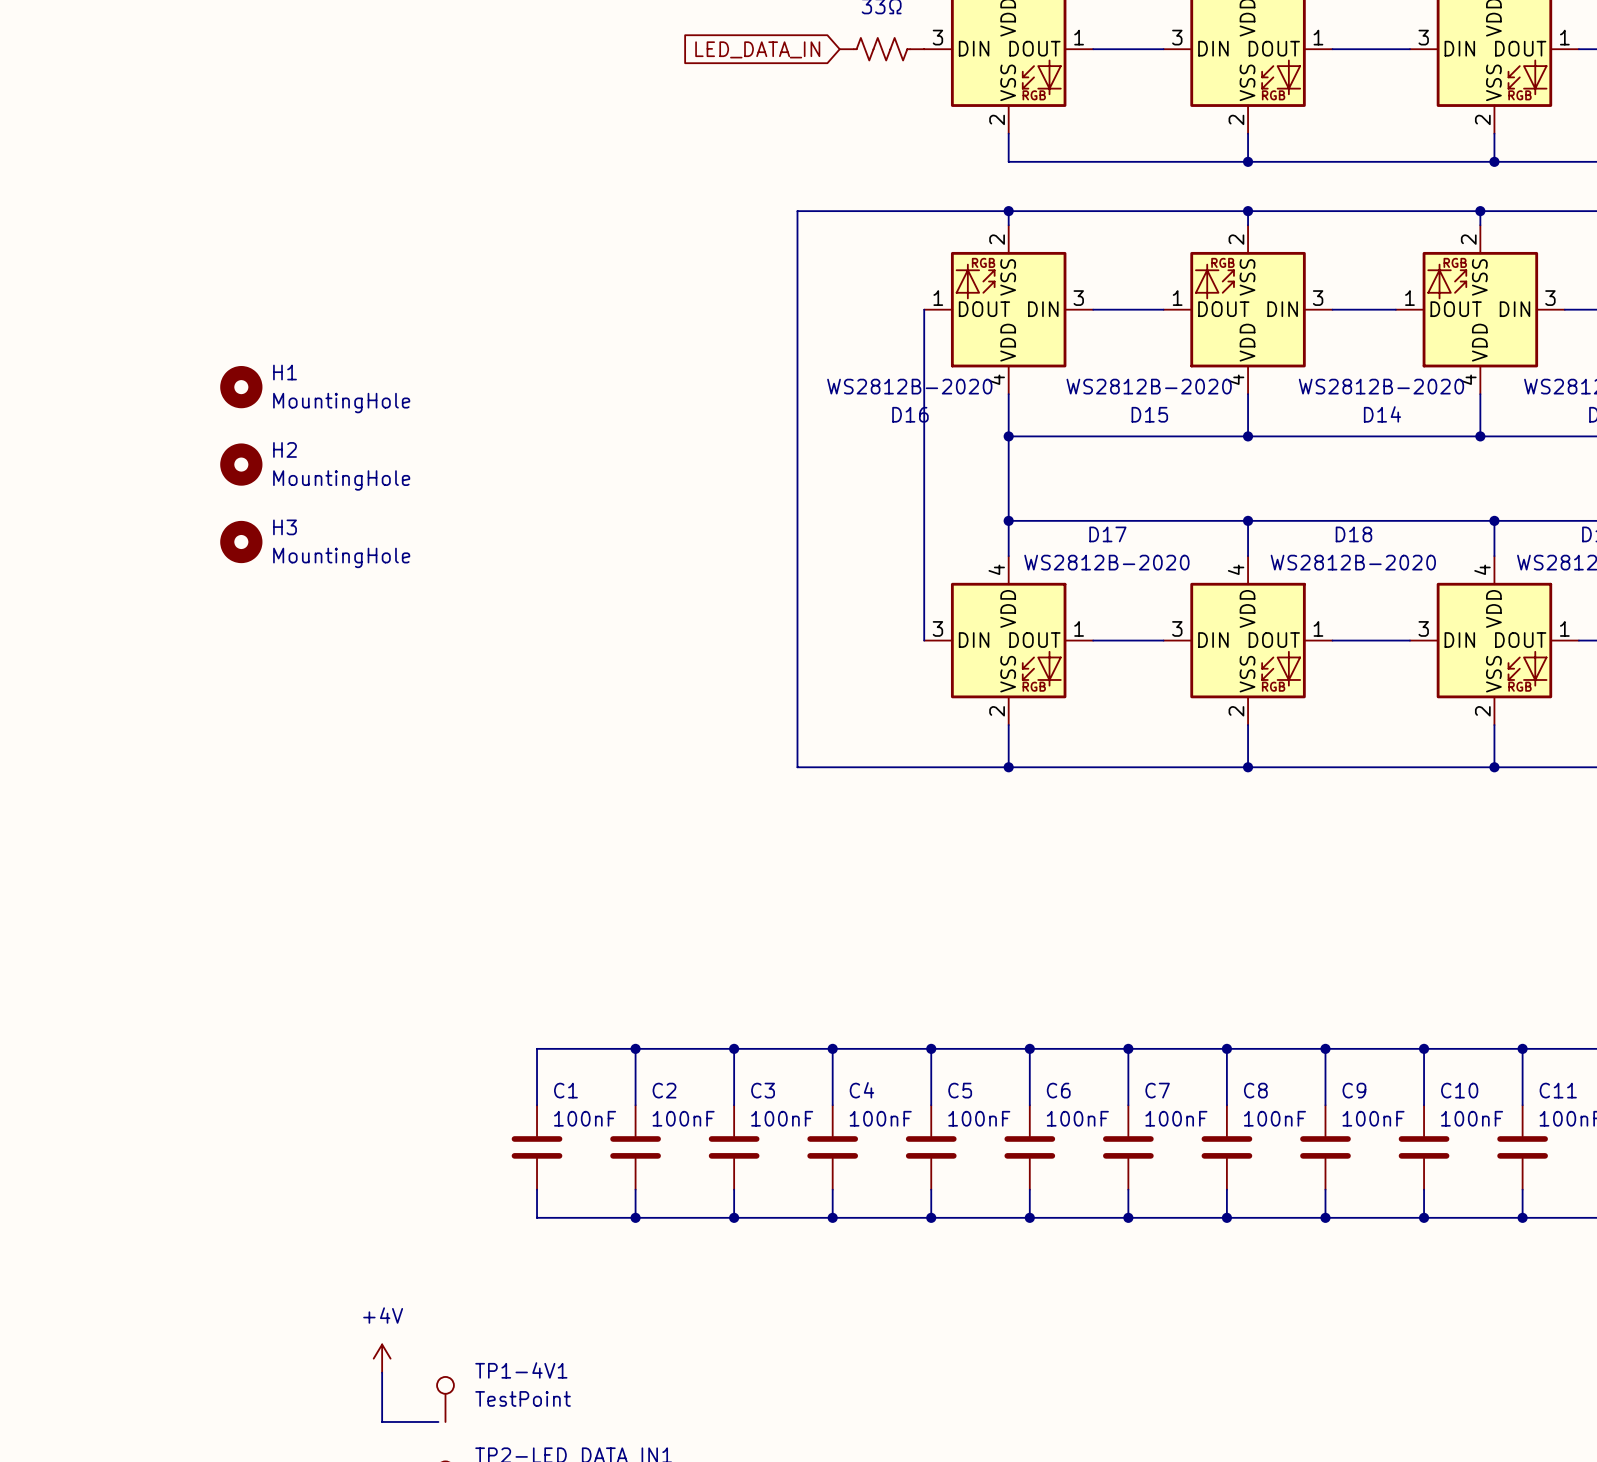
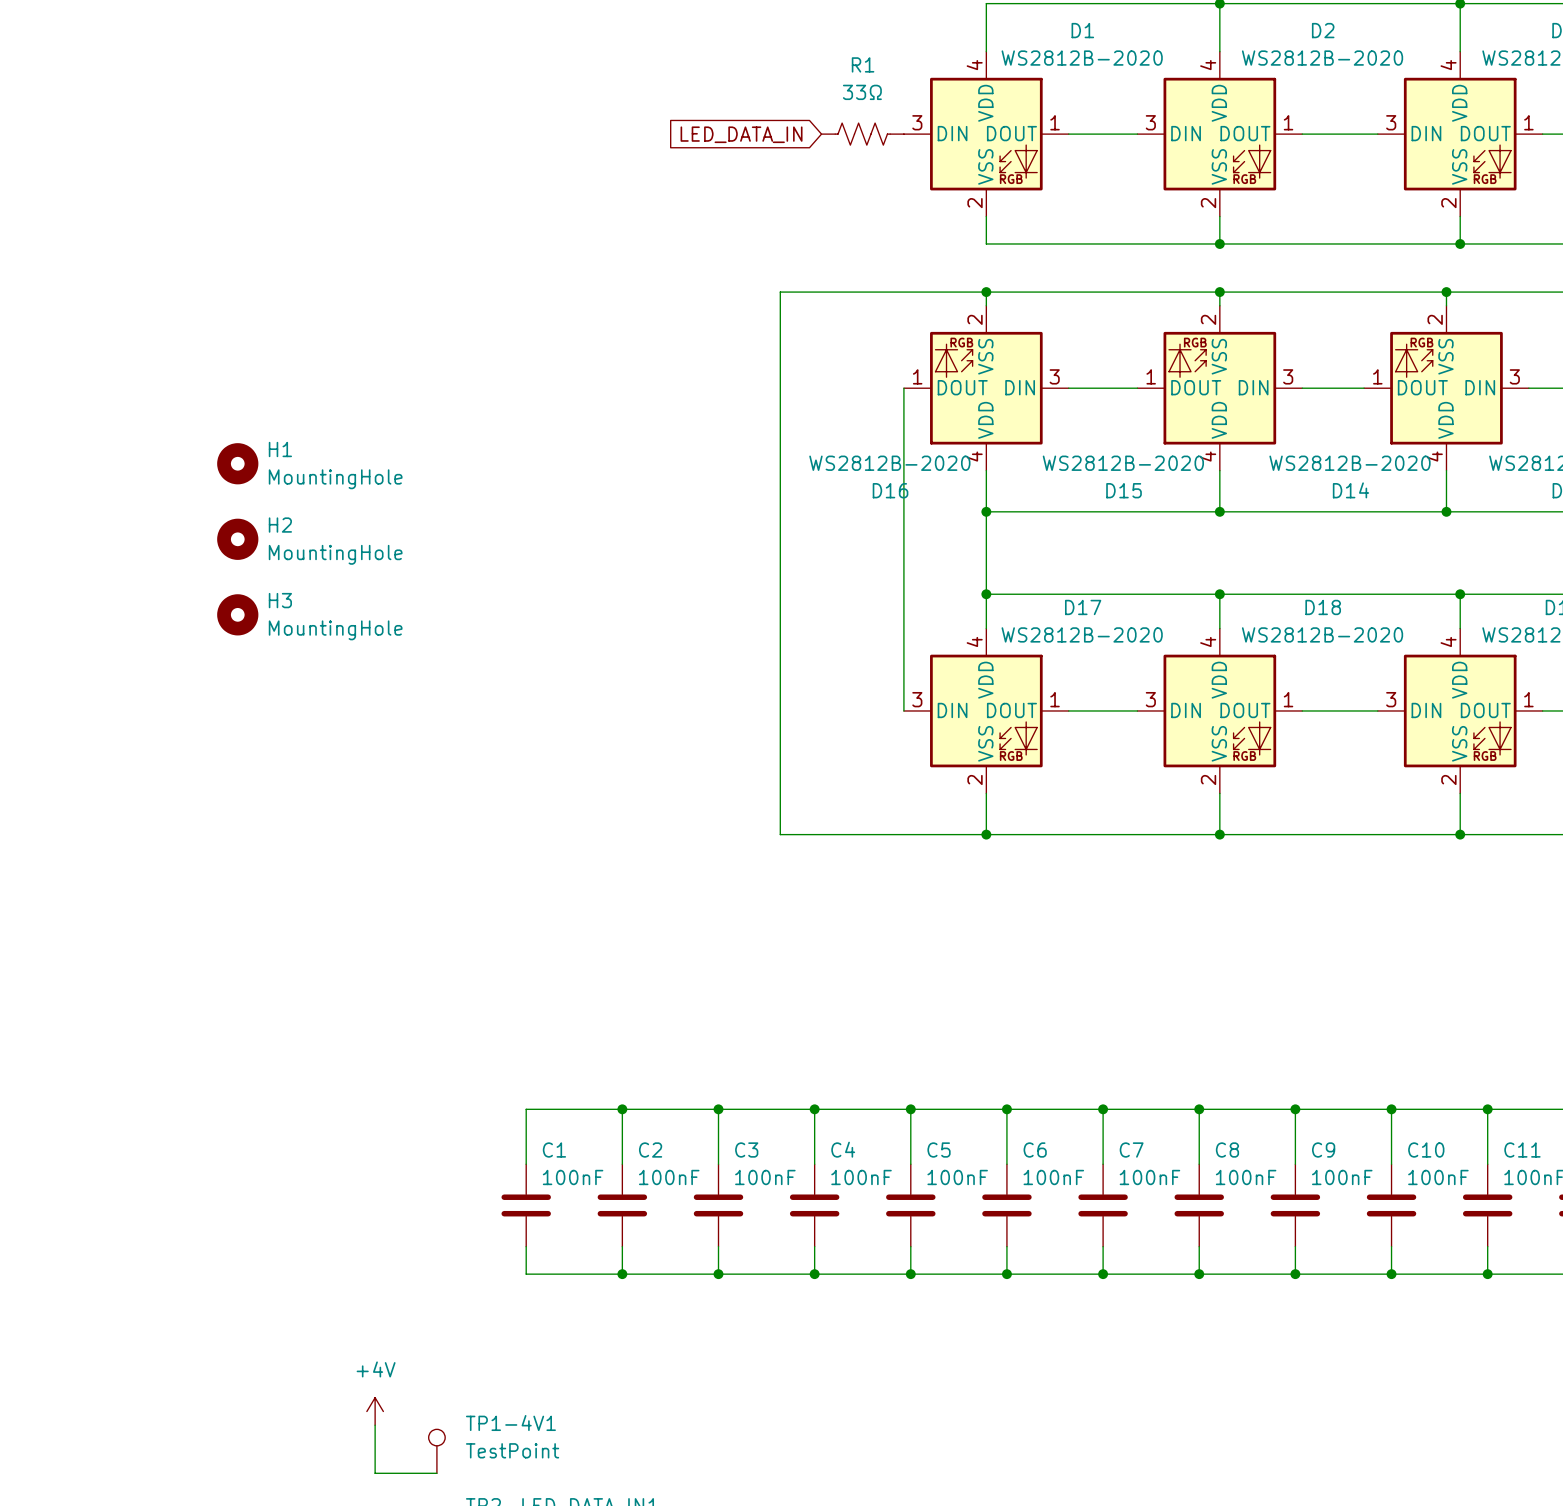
wire: none -> (430, 1473) (436, 1473)

